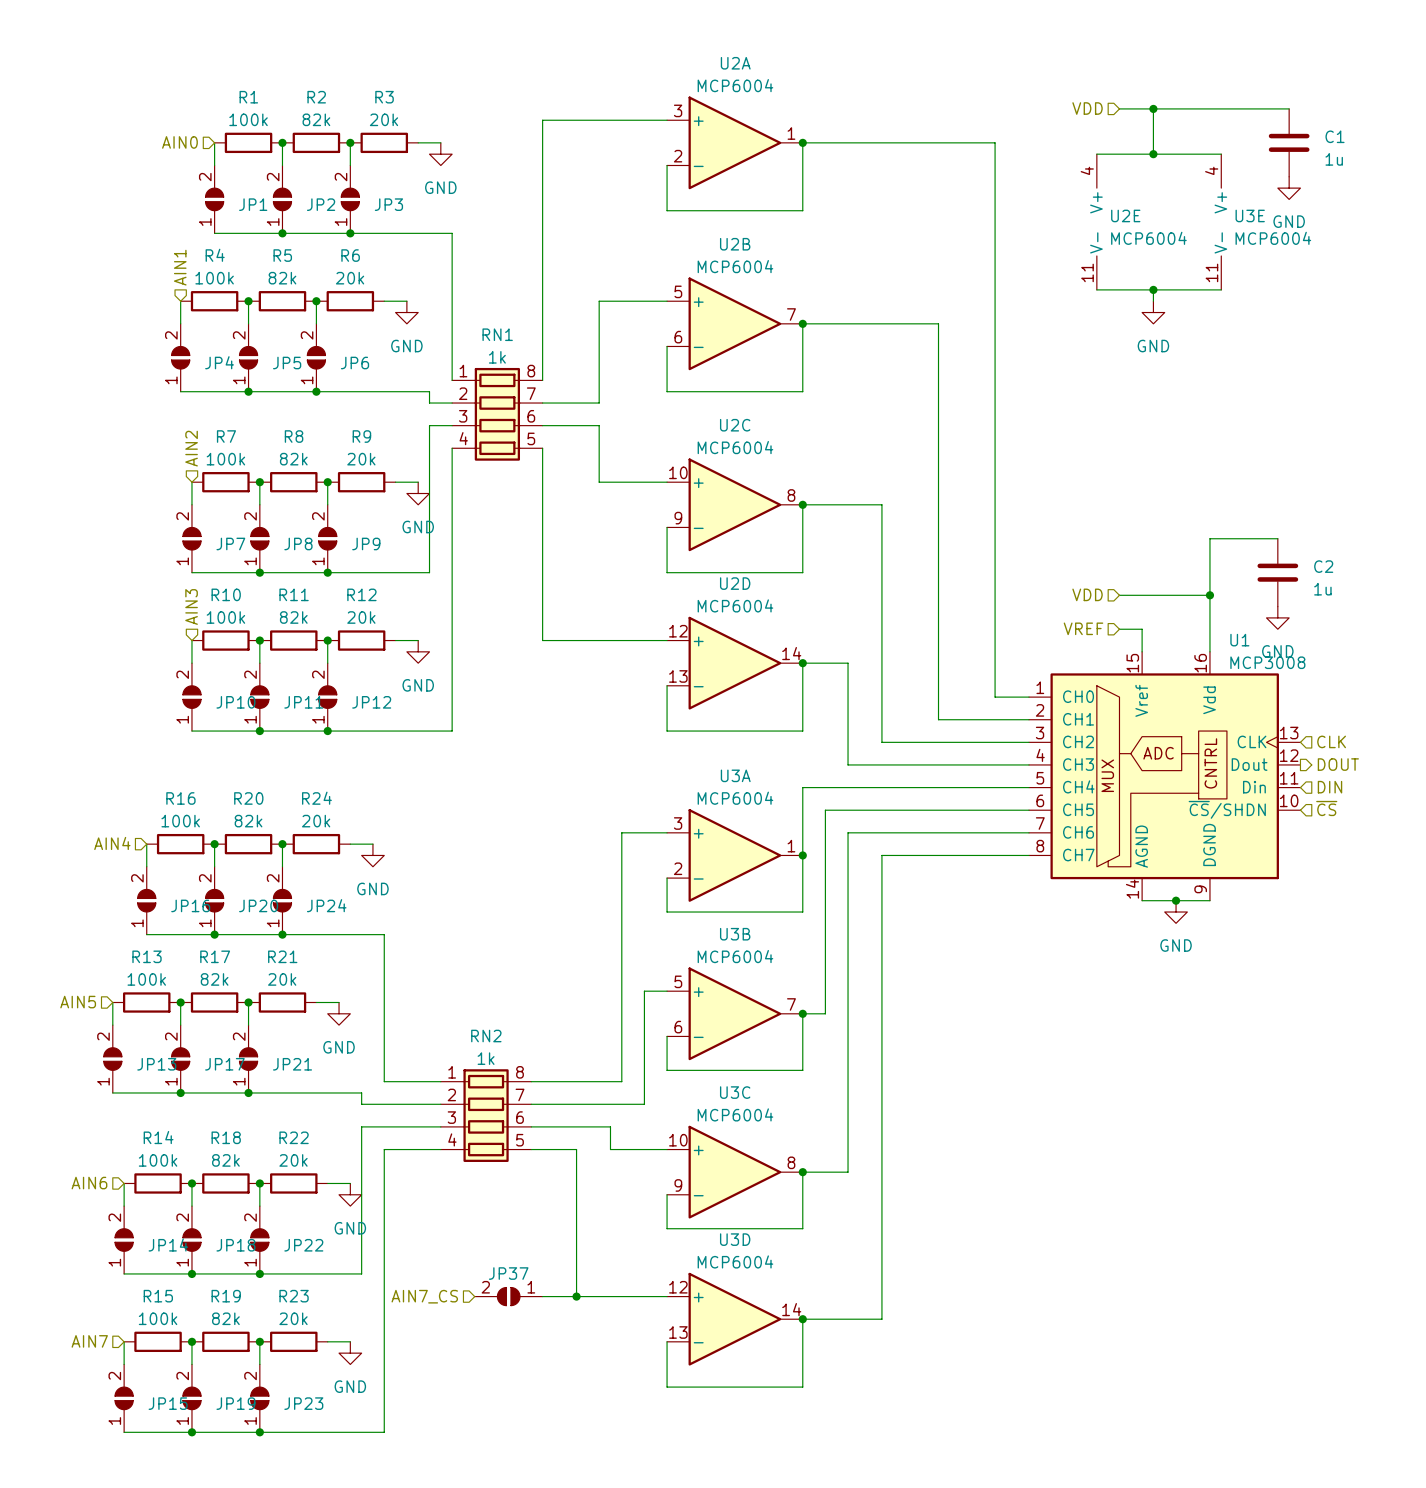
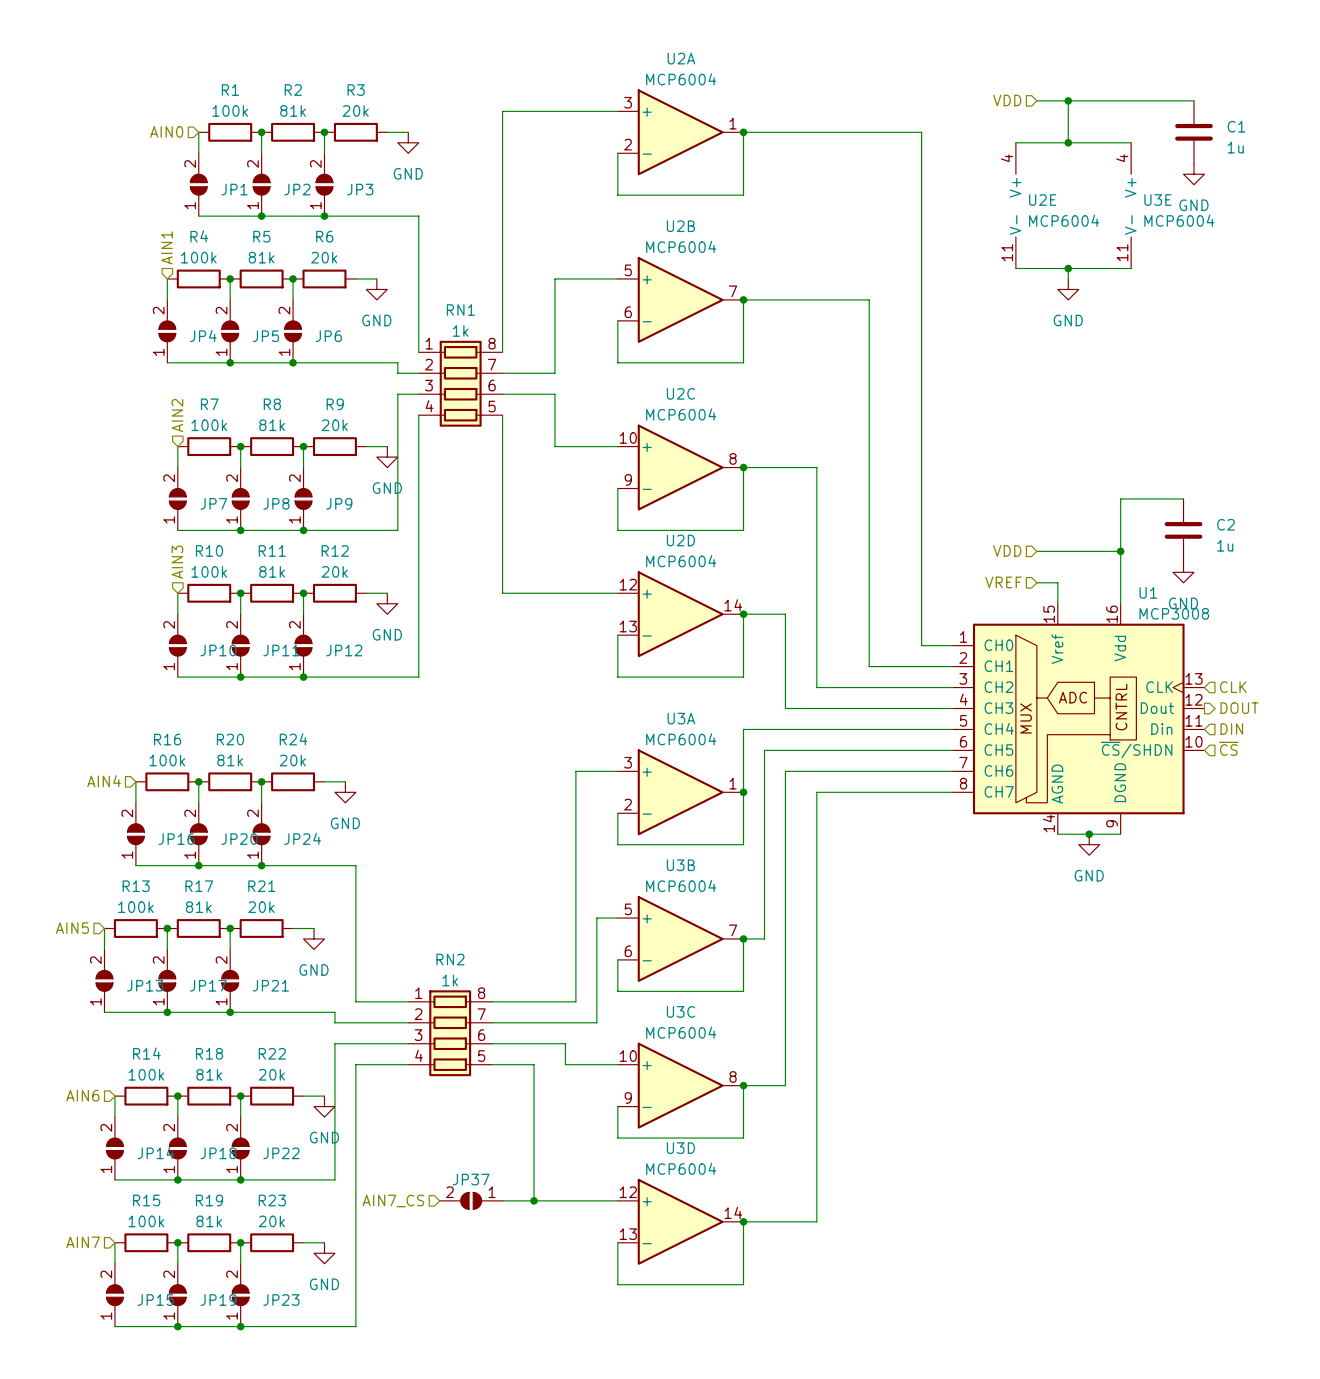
R2 value: 82k (316, 119) -> 81k (293, 110)
R5 value: 82k (282, 278) -> 81k (261, 257)
R8 value: 82k (293, 459) -> 81k (272, 425)
R11 value: 82k (293, 617) -> 81k (272, 571)
R20 value: 82k (248, 821) -> 81k (230, 760)
R17 value: 82k (214, 979) -> 81k (198, 907)
R18 value: 82k (225, 1160) -> 81k (209, 1074)
R19 value: 82k (225, 1318) -> 81k (209, 1221)

